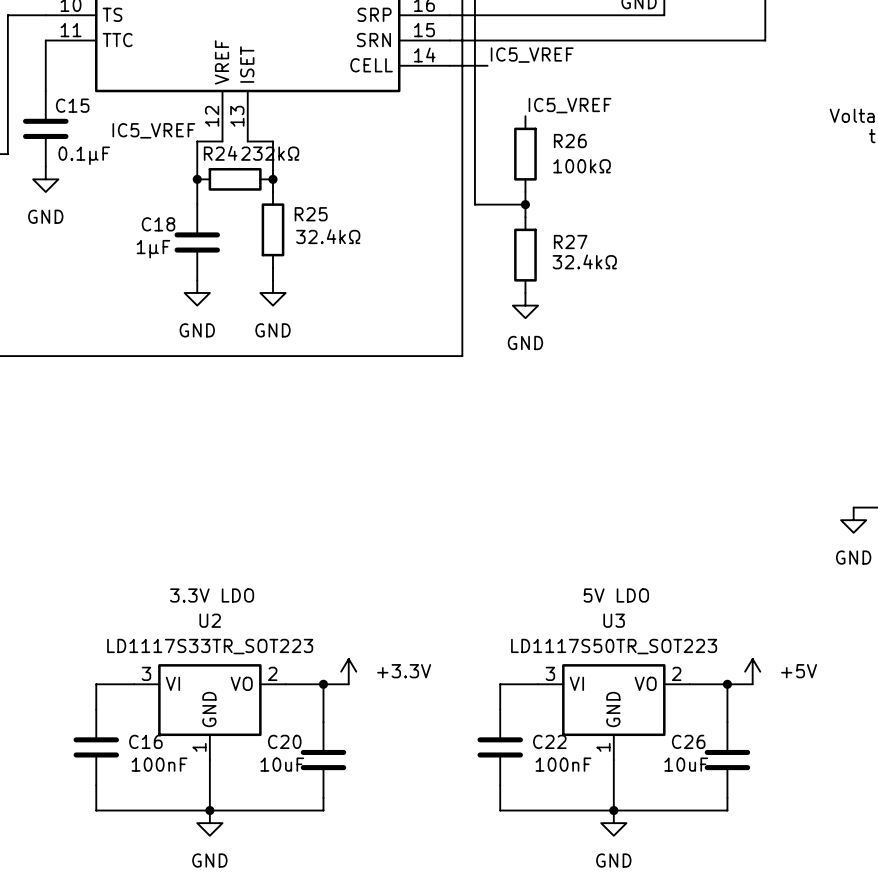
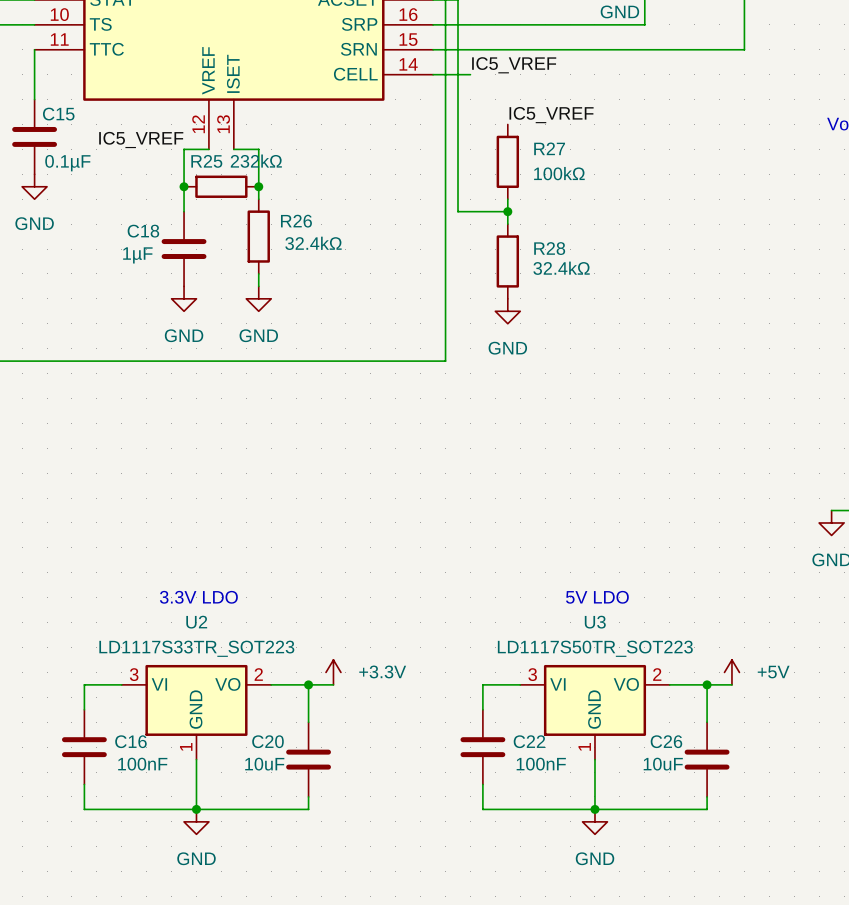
R26 name: R26 (570, 141) -> R27 (549, 148)
R24 name: R24 (220, 153) -> R25 (206, 161)
R25 name: R25 (311, 214) -> R26 (296, 221)
R27 name: R27 (570, 242) -> R28 (549, 248)

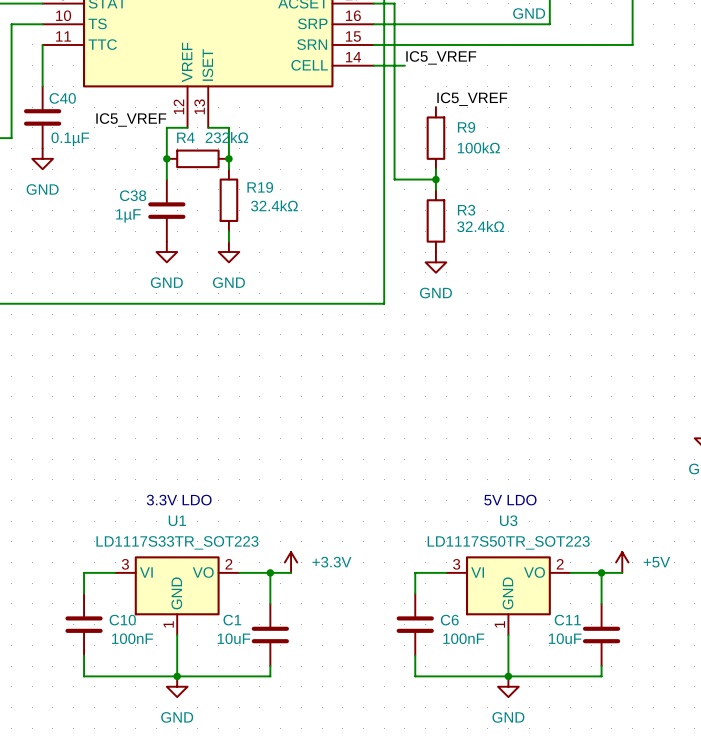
C15 name: C15 (58, 114) -> C40 (62, 98)
R27 name: R27 (549, 148) -> R9 (466, 127)
R25 name: R25 (206, 161) -> R4 (185, 137)
R26 name: R26 (296, 221) -> R19 (260, 187)
C18 name: C18 (143, 231) -> C38 (133, 195)
R28 name: R28 (549, 248) -> R3 (466, 210)
U2 name: U2 (196, 622) -> U1 (177, 520)
C16 name: C16 (130, 741) -> C10 (122, 620)
C20 name: C20 (267, 741) -> C1 (232, 620)
C22 name: C22 (529, 741) -> C6 (449, 620)
C26 name: C26 (666, 741) -> C11 (567, 620)

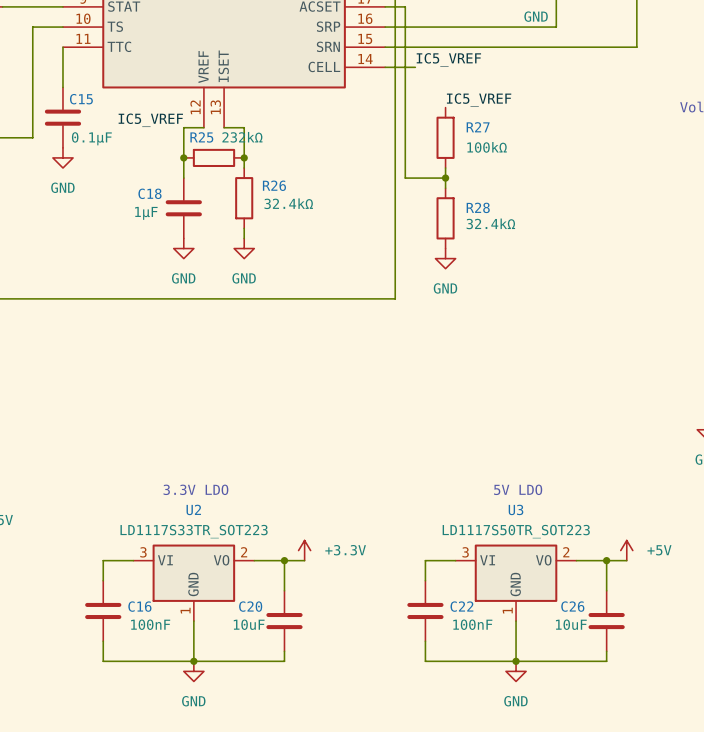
C40 name: C40 (62, 98) -> C15 (81, 99)
R9 name: R9 (466, 127) -> R27 (478, 127)
R4 name: R4 (185, 137) -> R25 (201, 137)
R19 name: R19 (260, 187) -> R26 (274, 185)
C38 name: C38 (133, 195) -> C18 (149, 193)
R3 name: R3 (466, 210) -> R28 (478, 207)
U1 name: U1 (177, 520) -> U2 (193, 509)
C10 name: C10 (122, 620) -> C16 (139, 606)
C1 name: C1 (232, 620) -> C20 (250, 606)
C6 name: C6 (449, 620) -> C22 (461, 606)
C11 name: C11 (567, 620) -> C26 (572, 606)

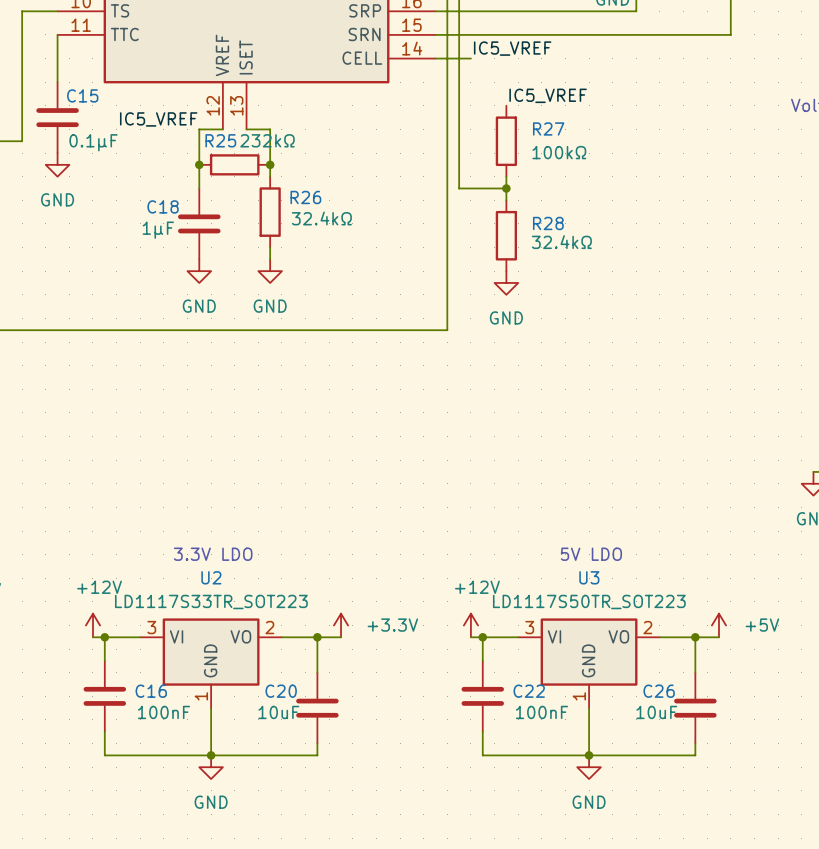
power symbol: none -> +12V (92, 625)
power symbol: none -> +12V (470, 625)
wire: none -> (92, 637) (104, 637)
junction: none -> (104, 637)
wire: none -> (470, 637) (482, 637)
junction: none -> (482, 637)

